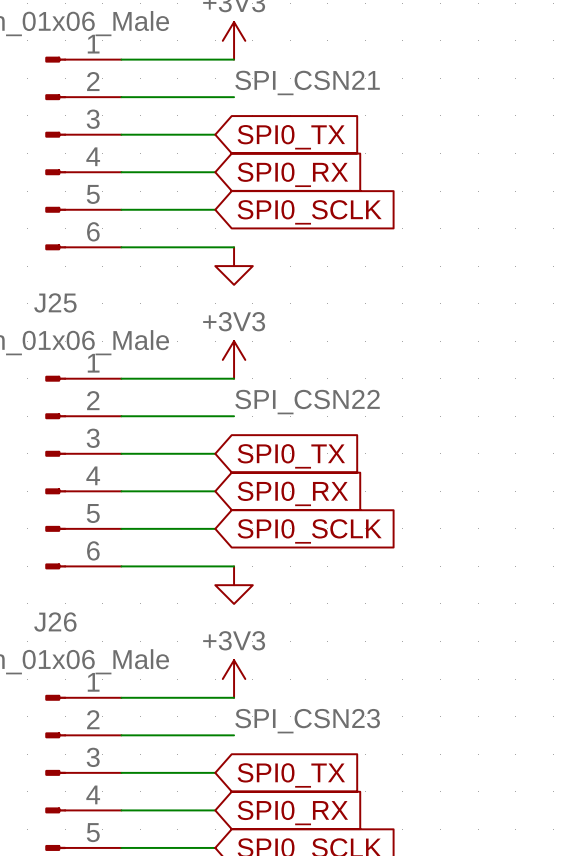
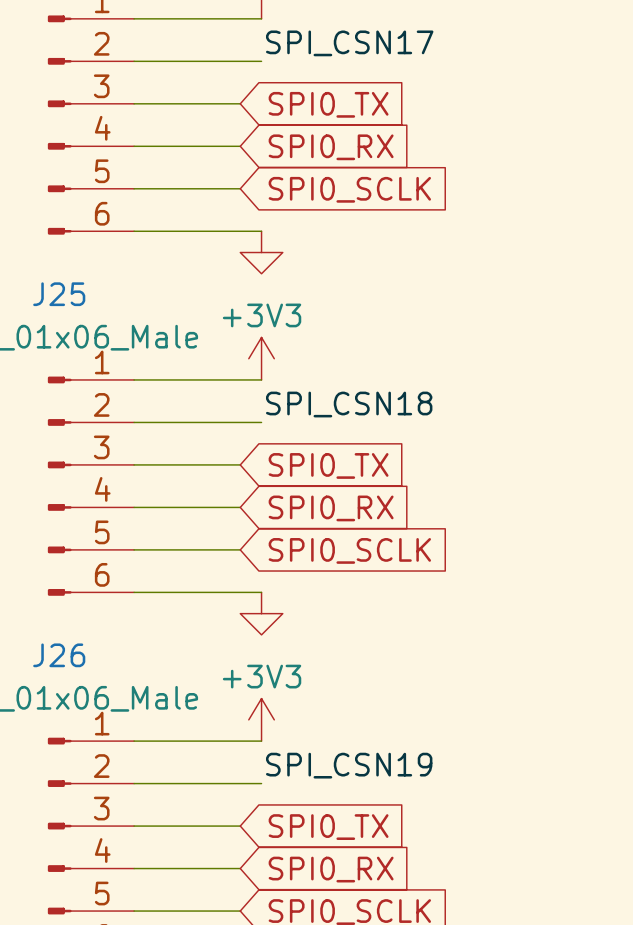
label: SPI_CSN21 (307, 82) -> SPI_CSN17 (349, 43)
label: SPI_CSN22 (307, 402) -> SPI_CSN18 (349, 404)
label: SPI_CSN23 (307, 721) -> SPI_CSN19 (349, 765)

